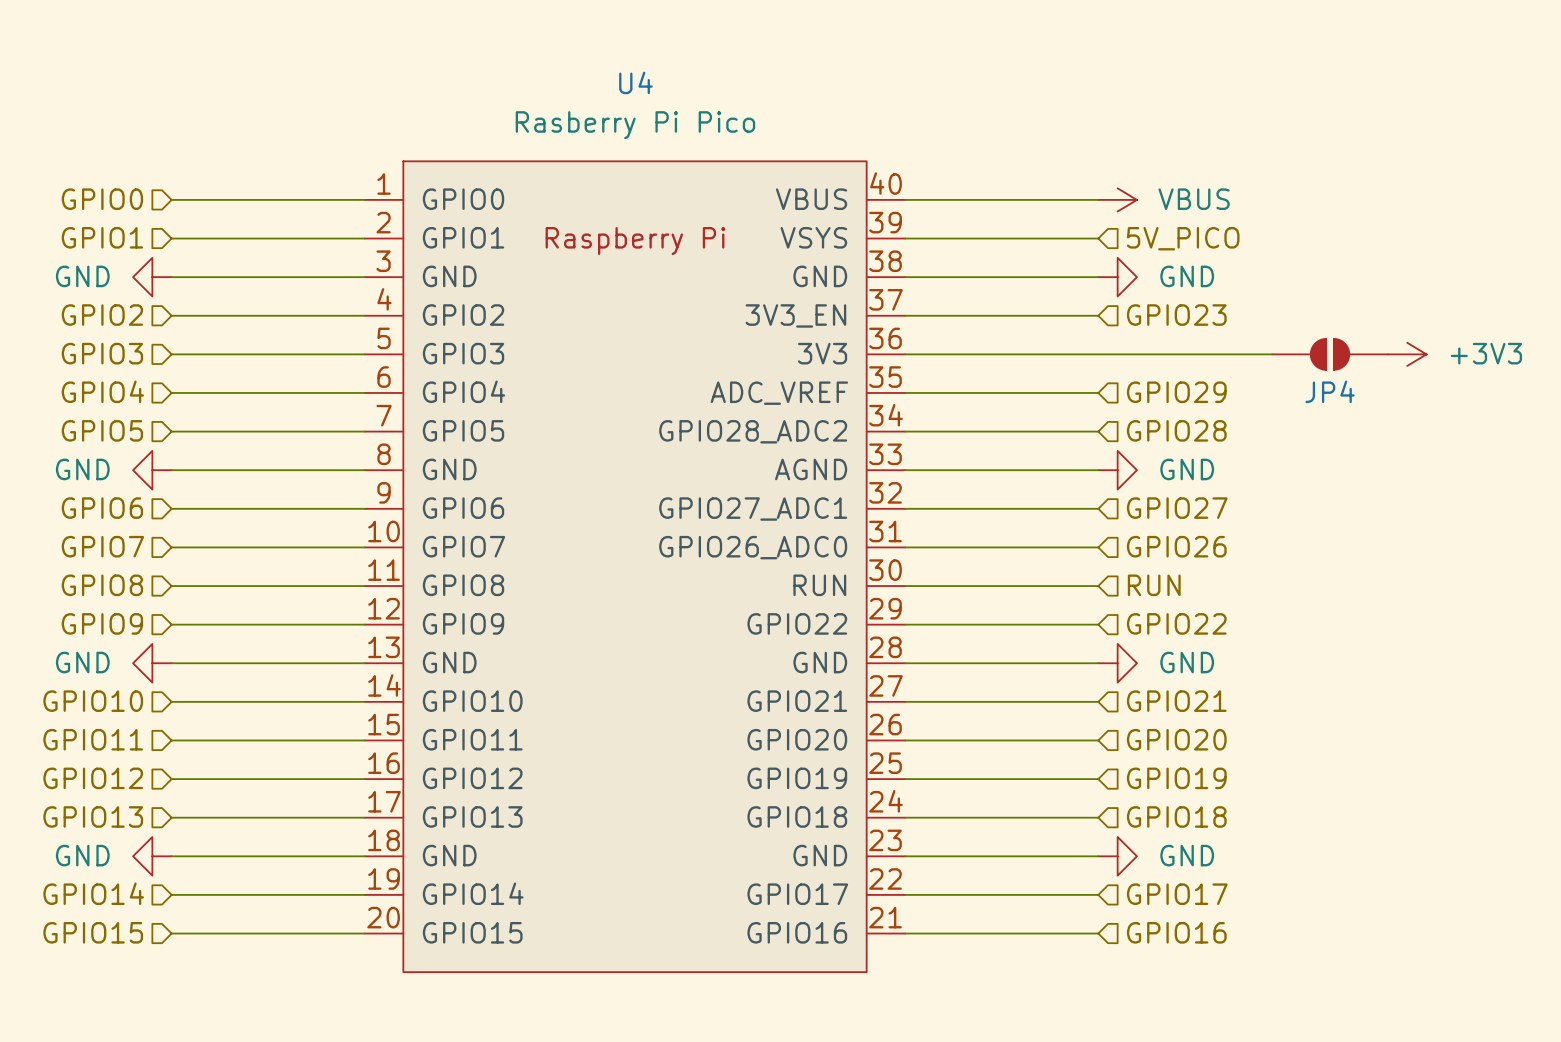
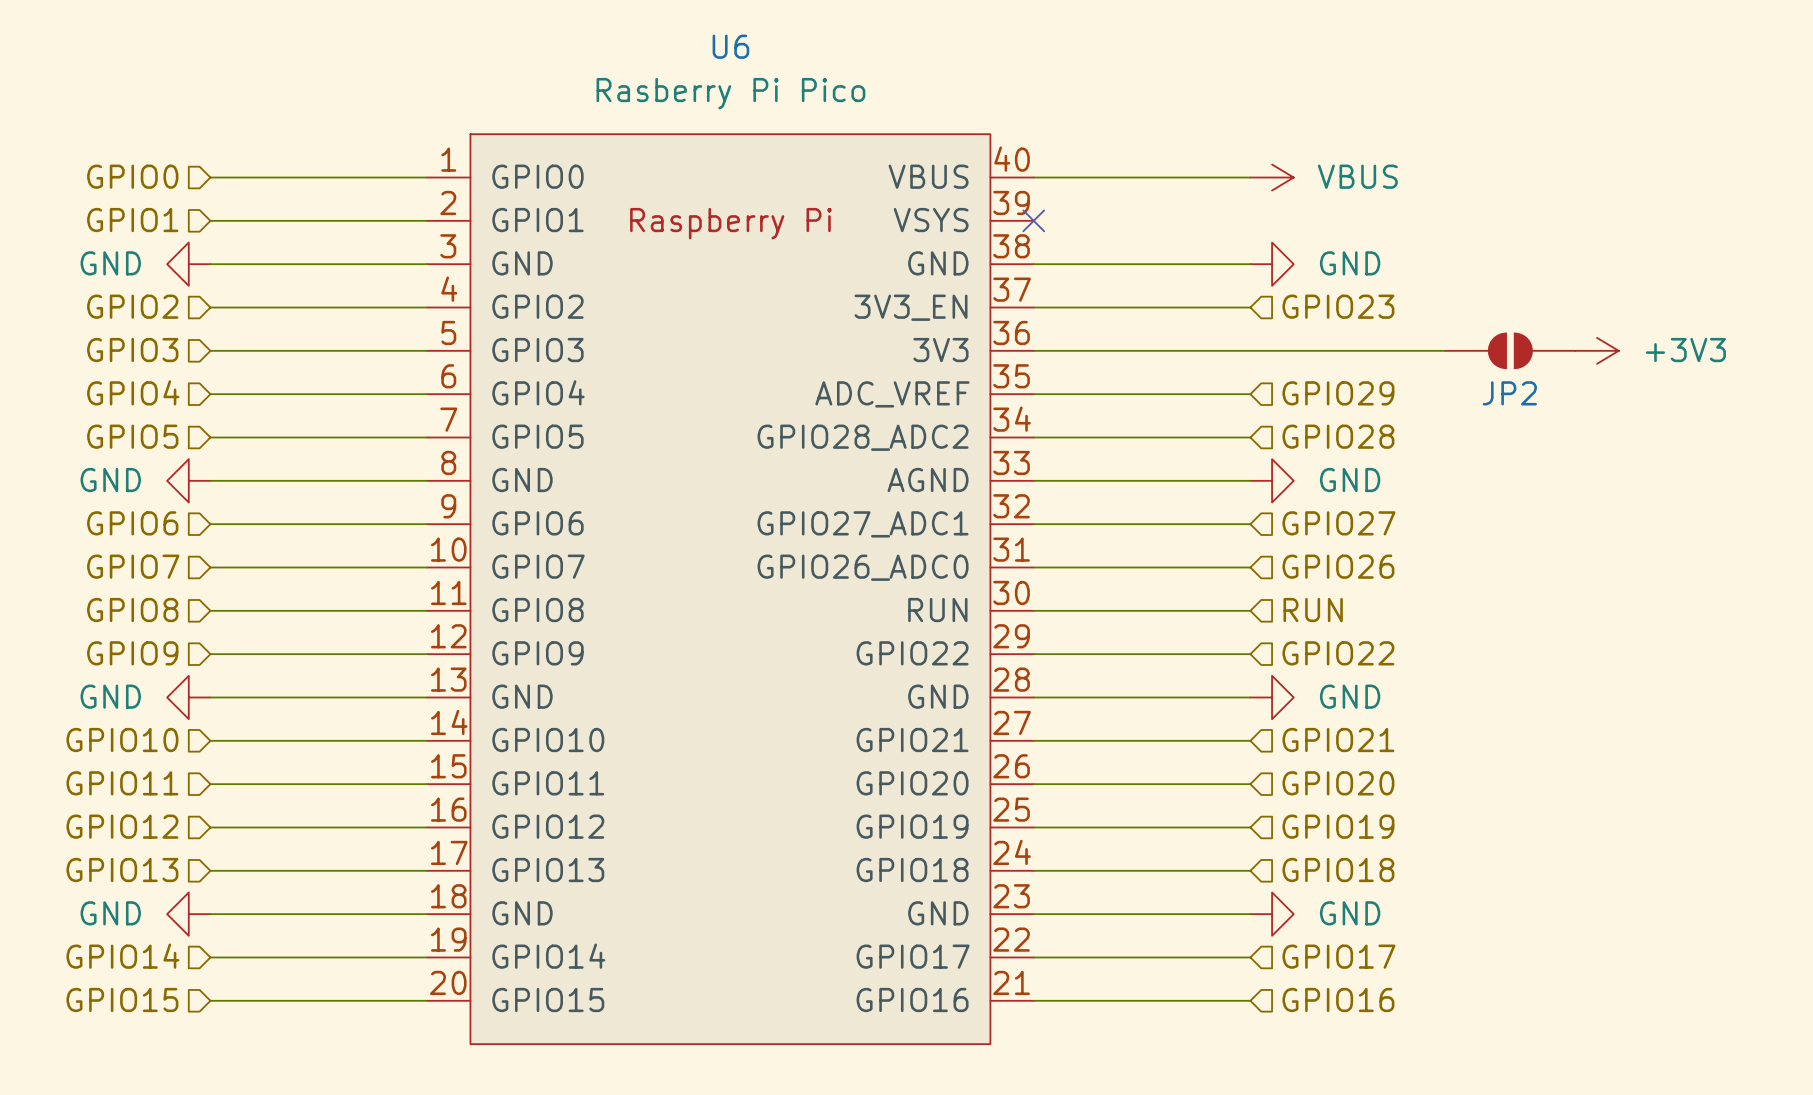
U4 name: U4 (635, 82) -> U6 (730, 46)
wire: (905, 238) (1098, 238) -> none
no-connect mark: none -> (1033, 220)
hierarchical label: 5V_PICO (1183, 238) -> none
JP4 name: JP4 (1330, 391) -> JP2 (1509, 393)

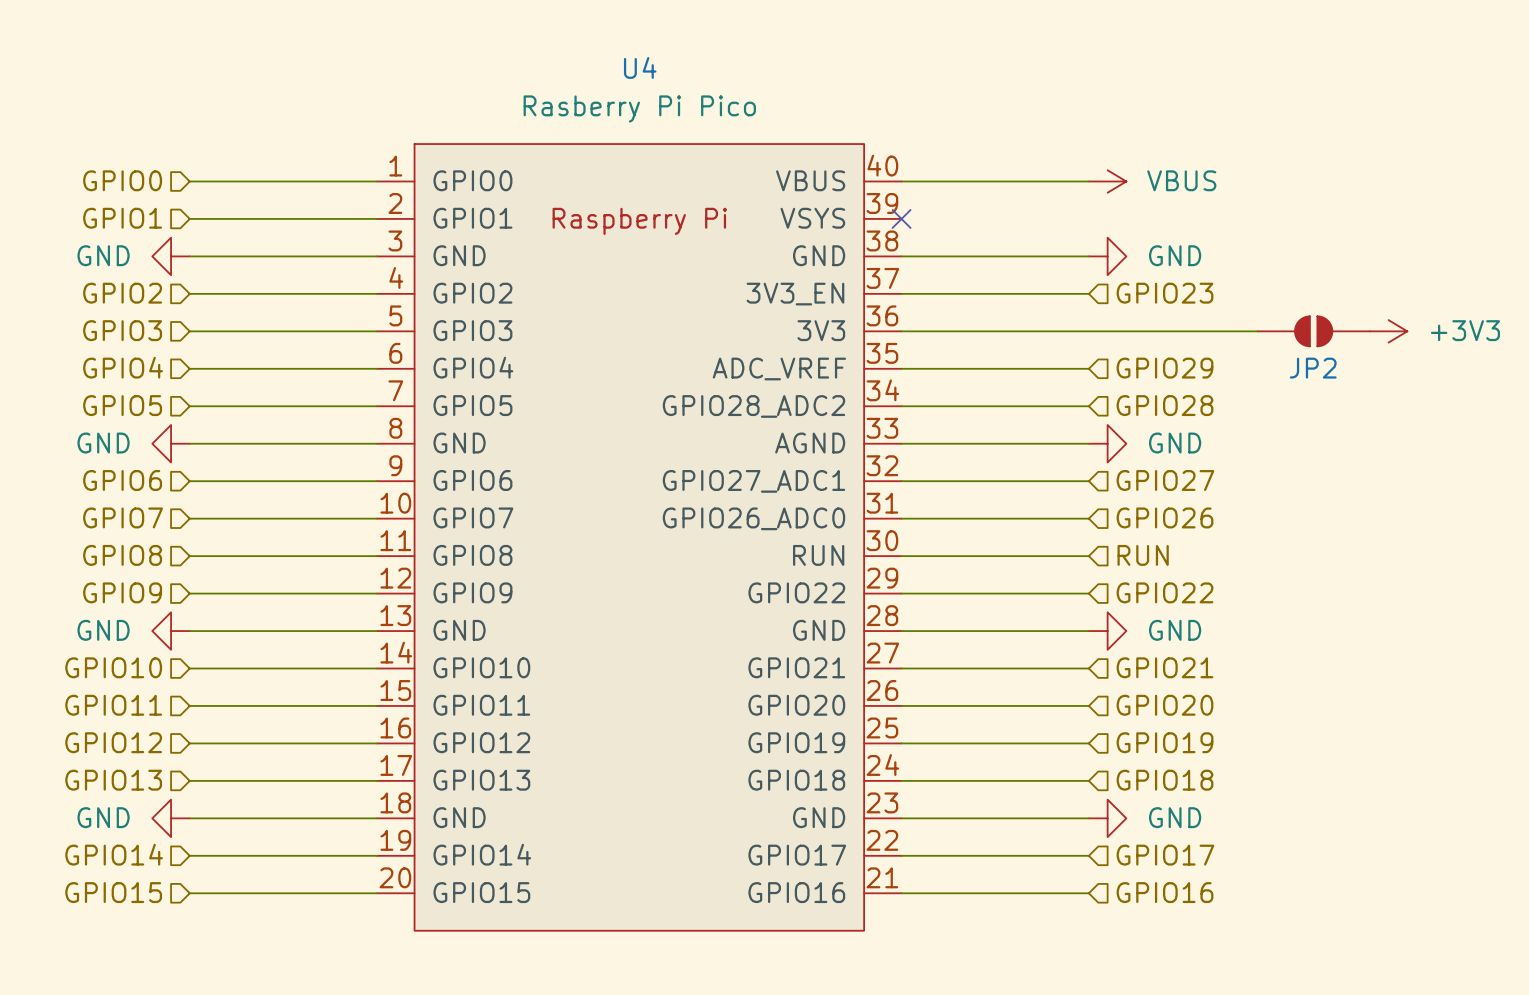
U6 name: U6 (730, 46) -> U4 (640, 67)

